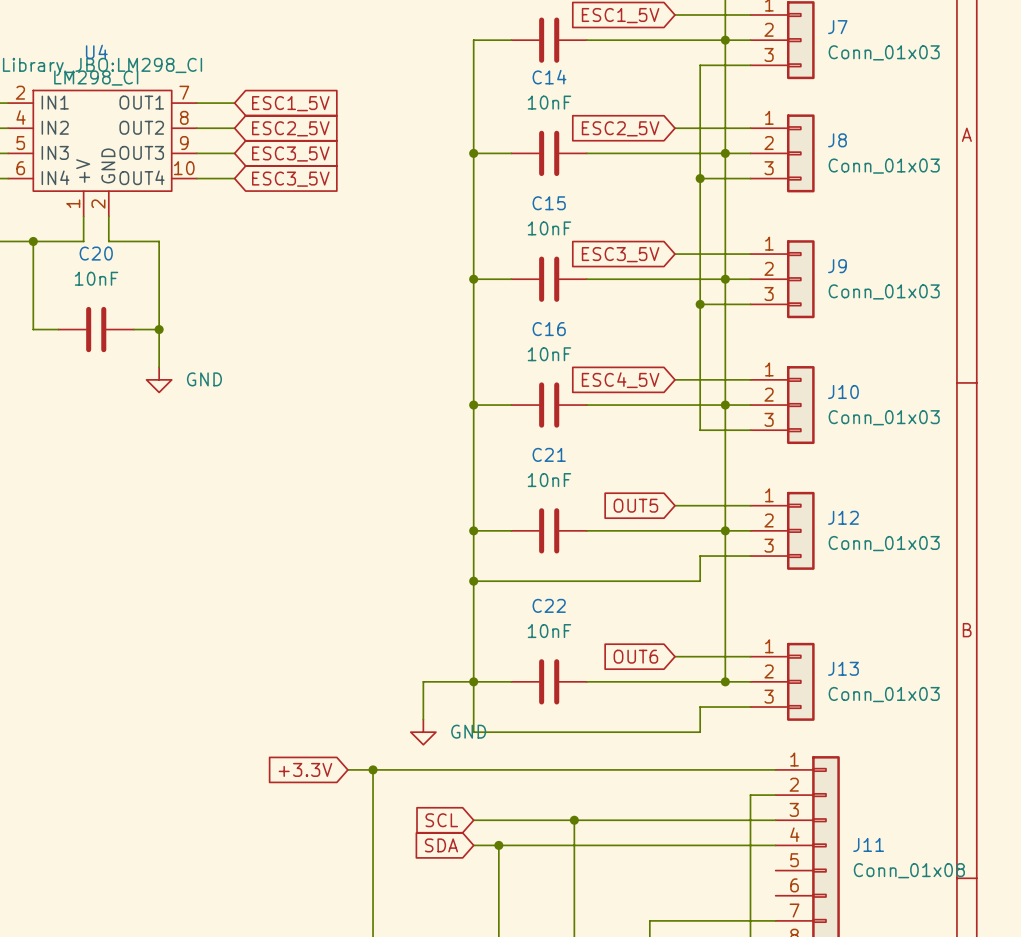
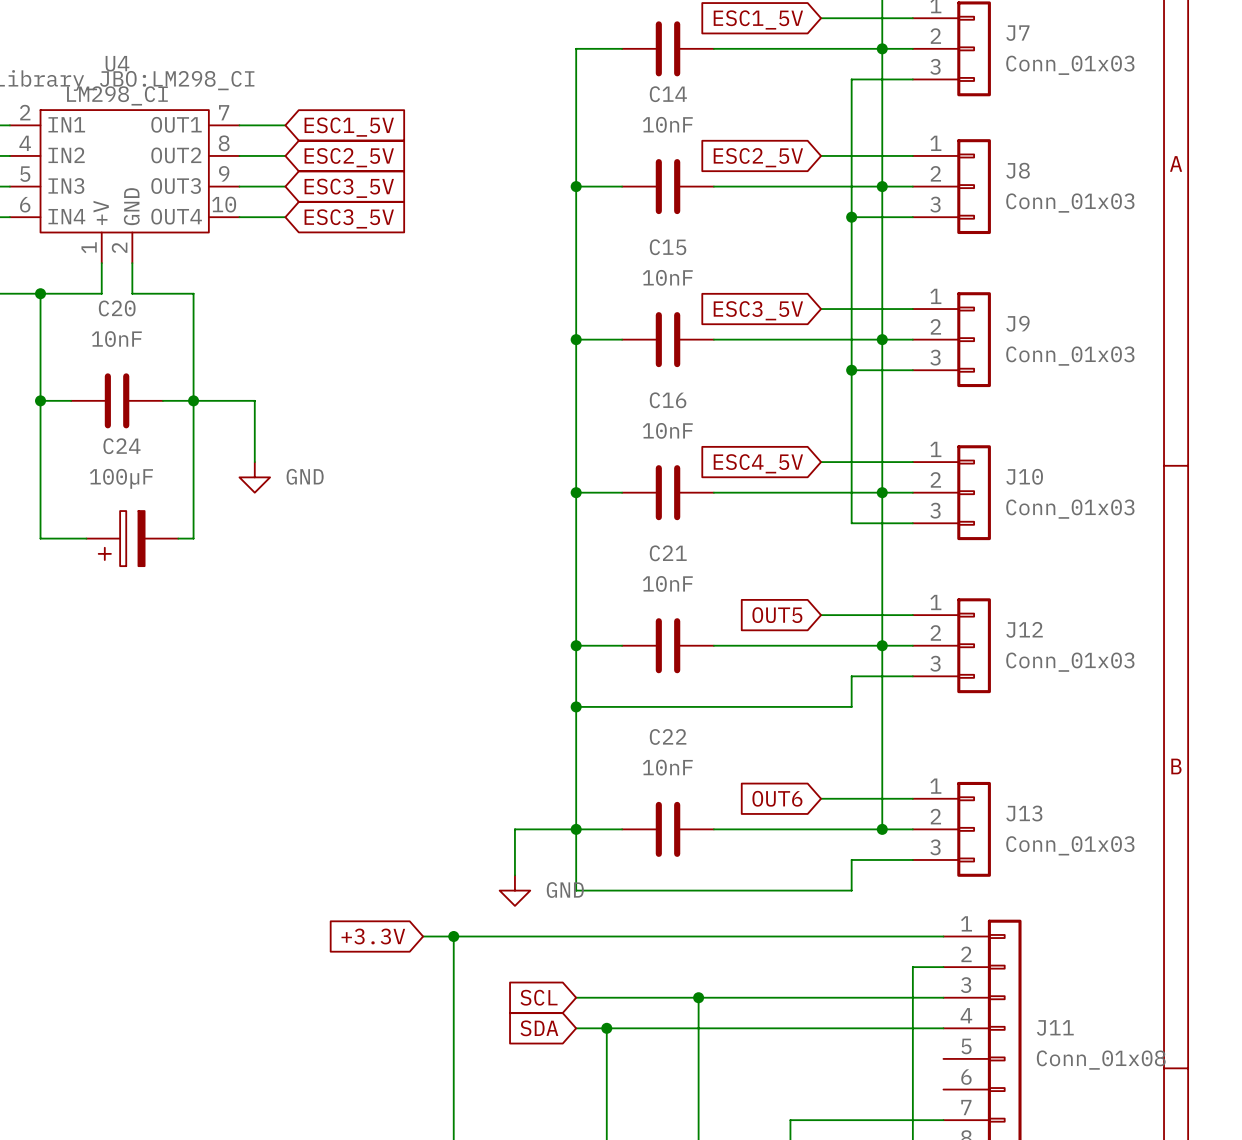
wire: none -> (40, 400) (40, 538) (86, 538)
junction: none -> (40, 400)
wire: none -> (193, 400) (254, 400) (254, 462)
wire: none -> (193, 446) (193, 538) (178, 538)
power symbol position: GND (159, 379) -> GND (254, 477)
C24: none -> 100µF (132, 538)

